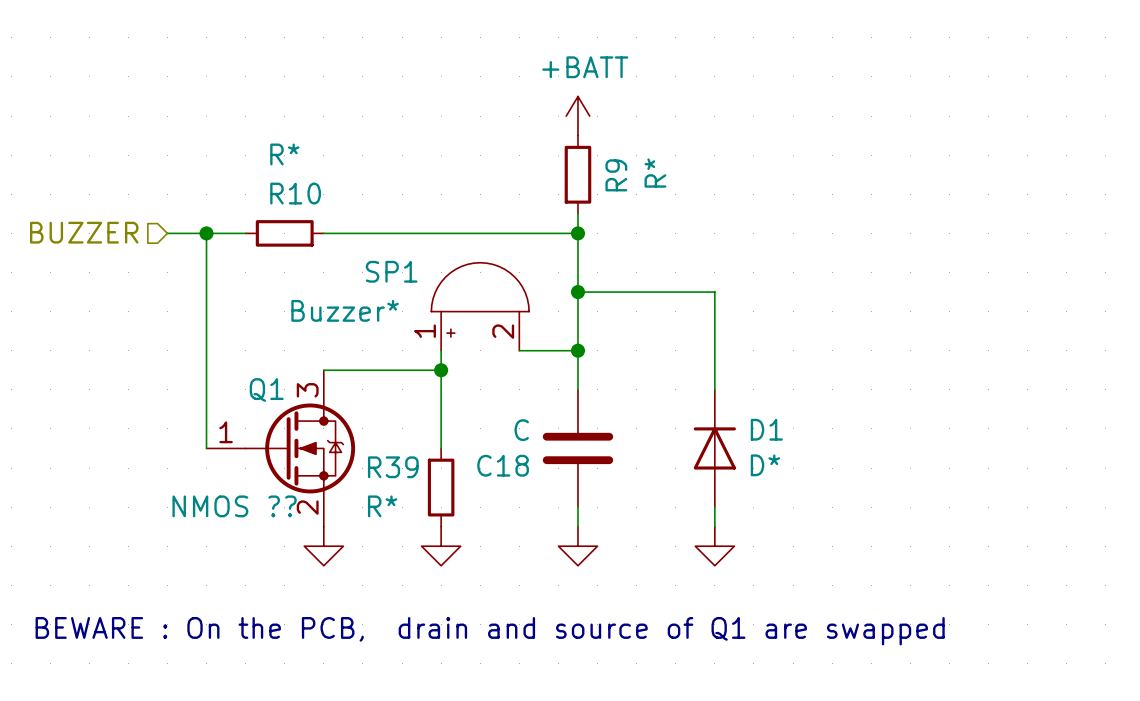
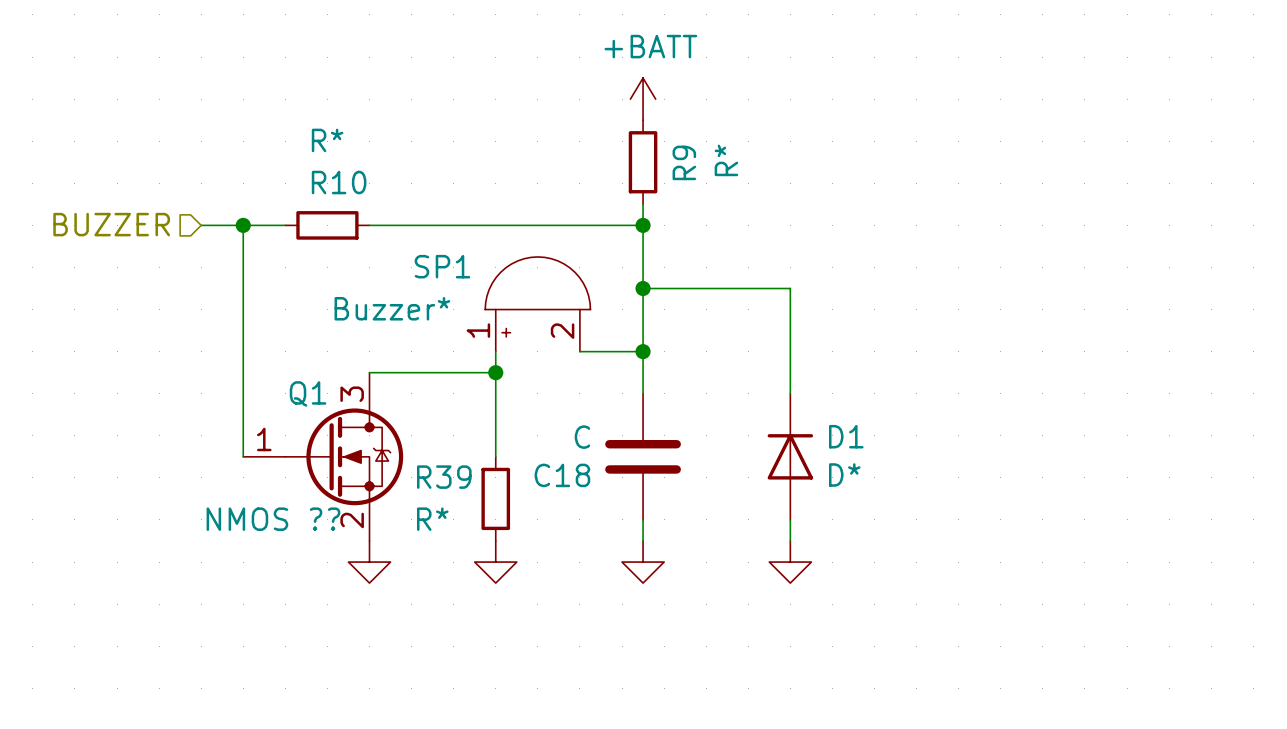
text: BEWARE : On the PCB, drain and source of Q1 are swapped (490, 631) -> none

